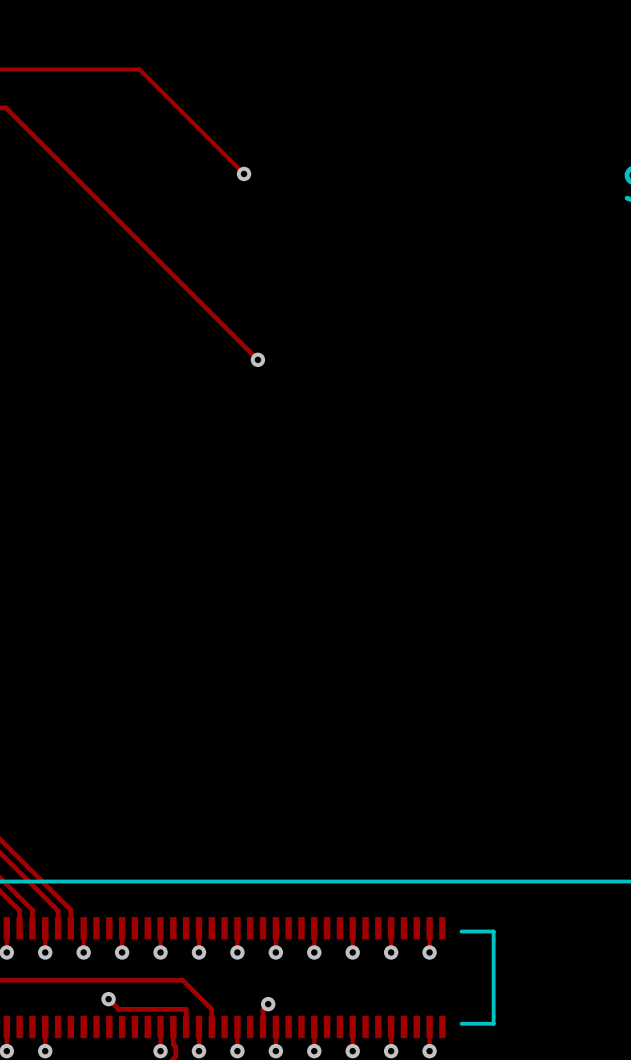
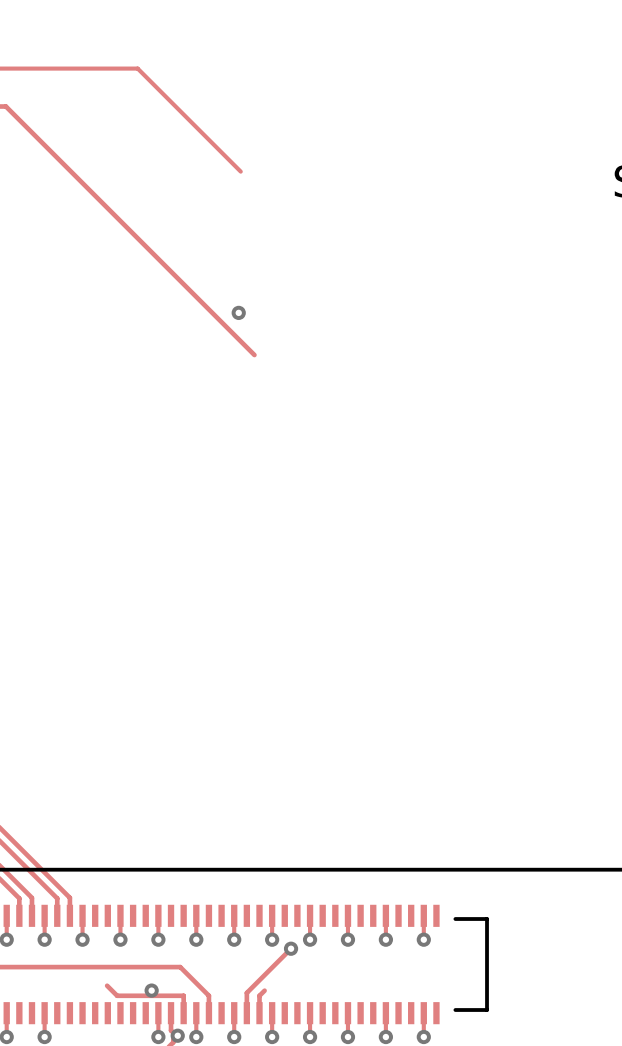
via: (244, 173) -> none
via position: (257, 359) -> (238, 312)
track: none -> (291, 948) (246, 992) (246, 1013)
via: none -> (291, 948)
via: (108, 999) -> none
via: none -> (151, 990)
via: (268, 1004) -> none
via: none -> (177, 1035)

